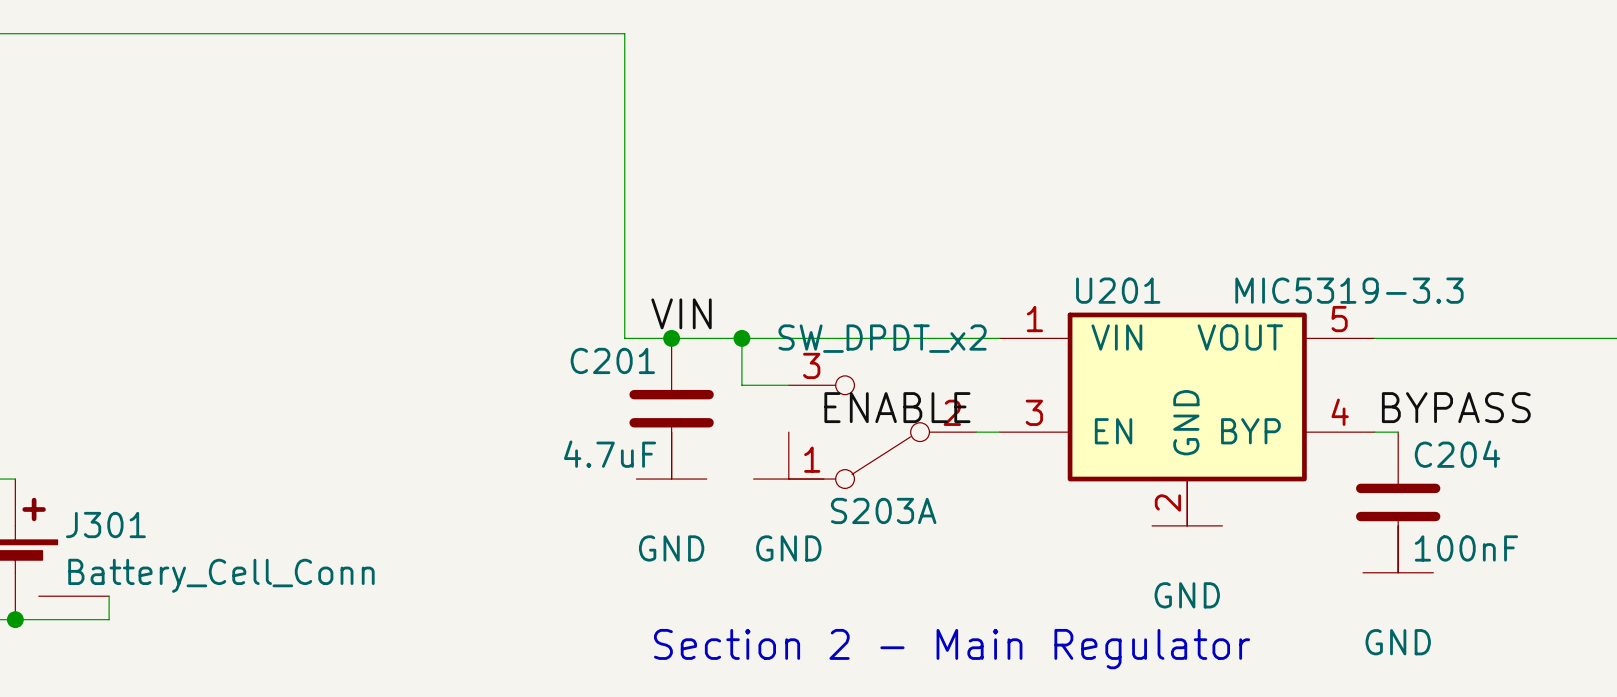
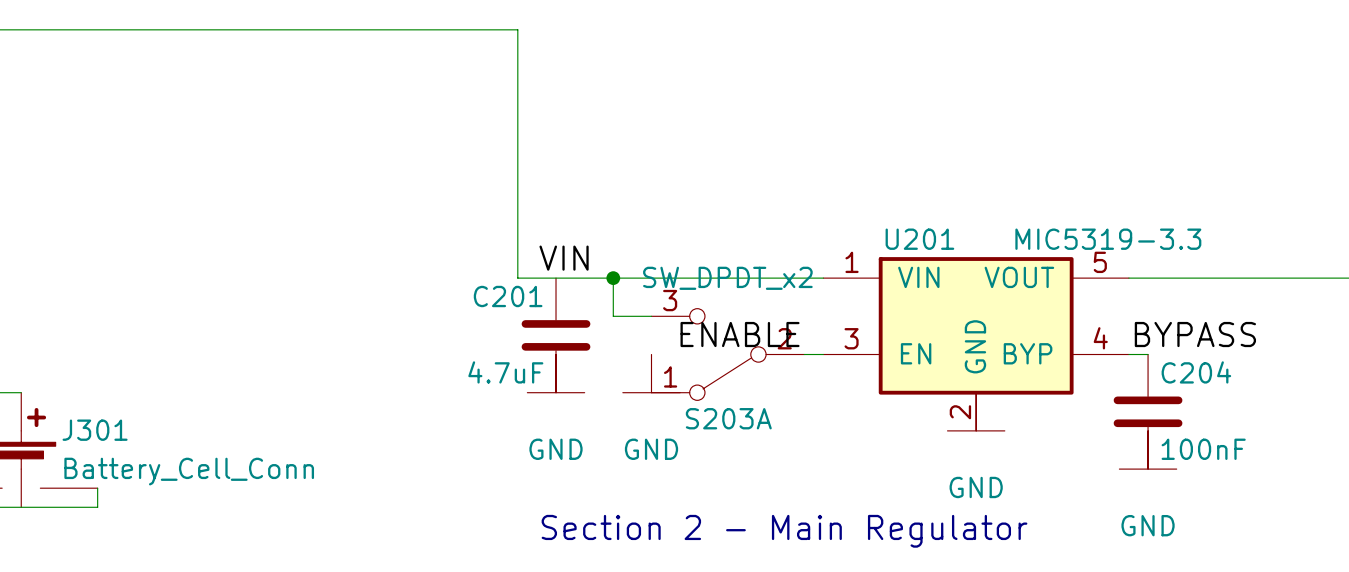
junction: (671, 338) -> none
junction: (15, 619) -> none

